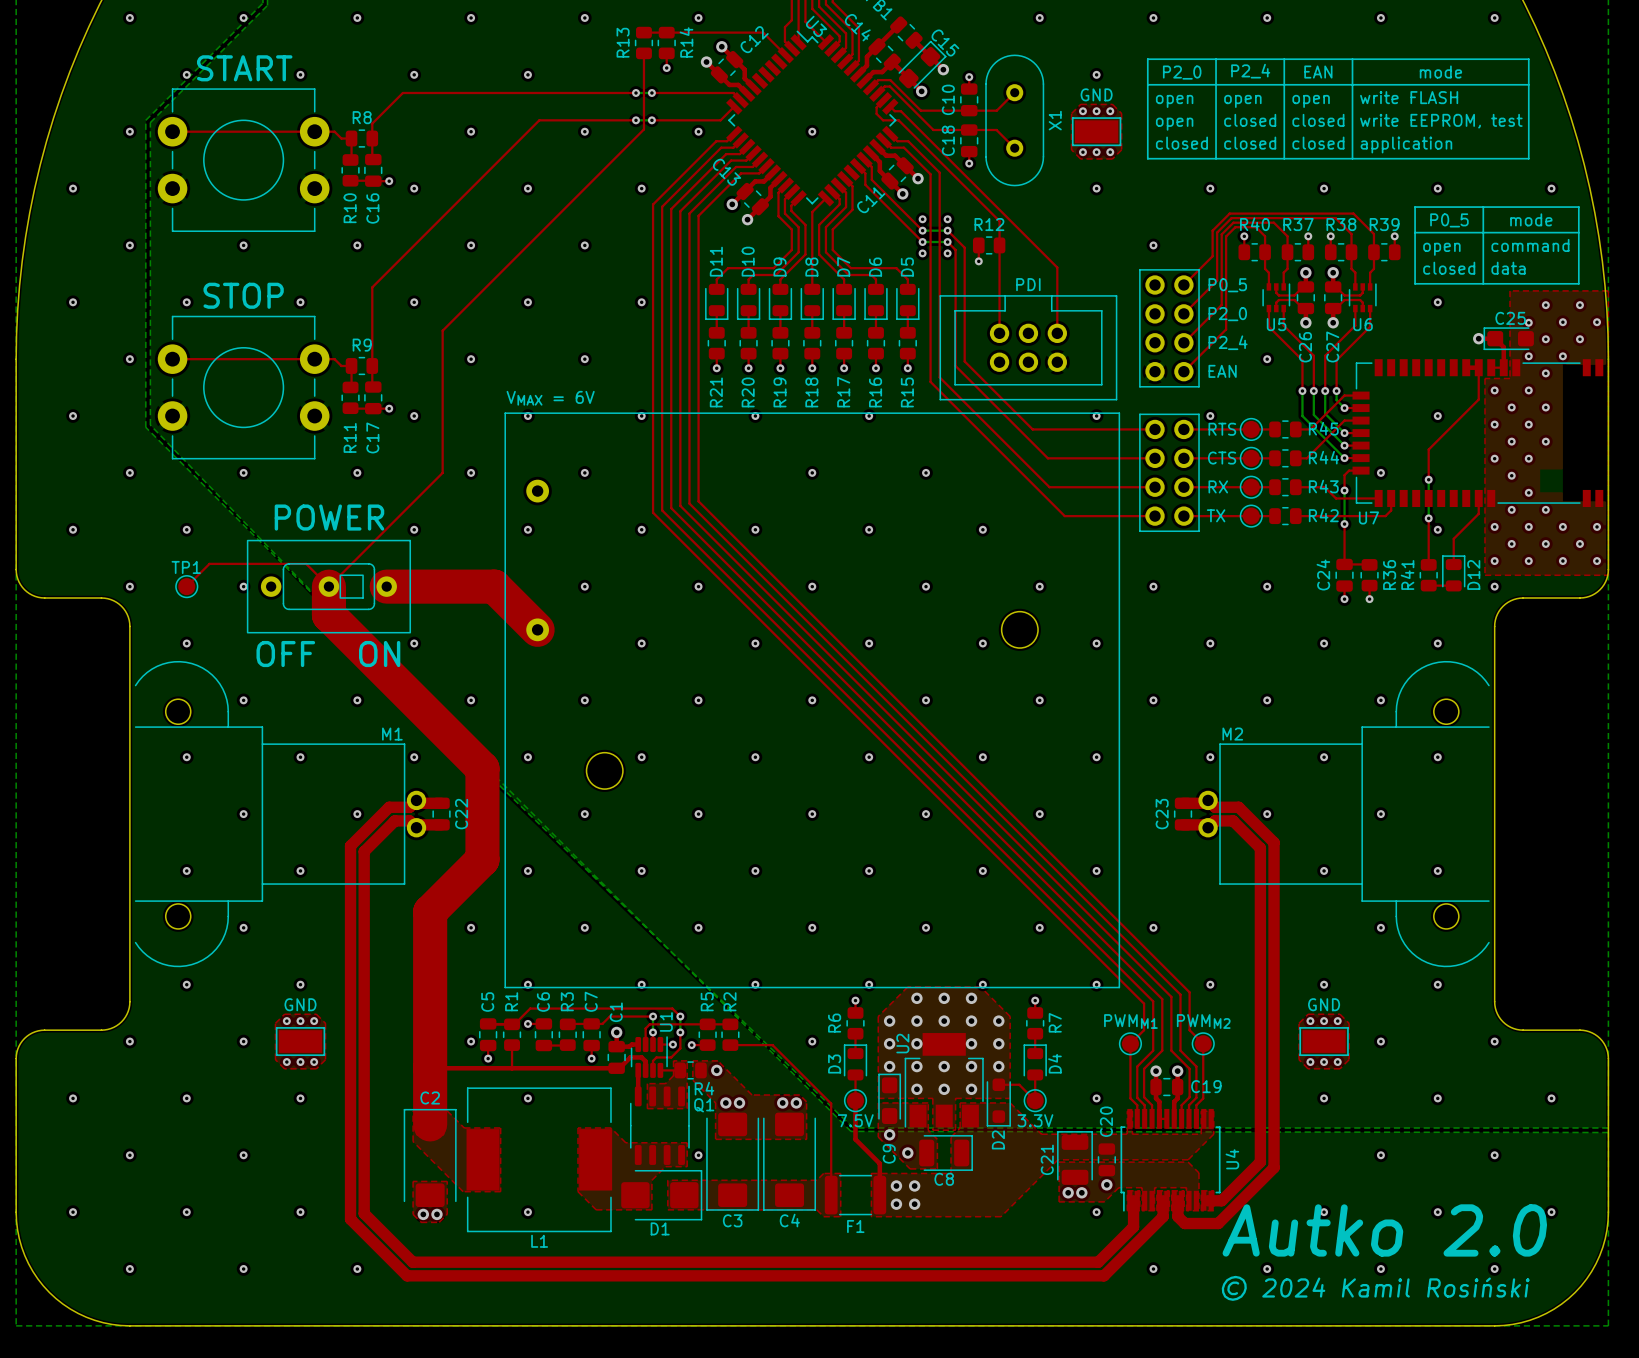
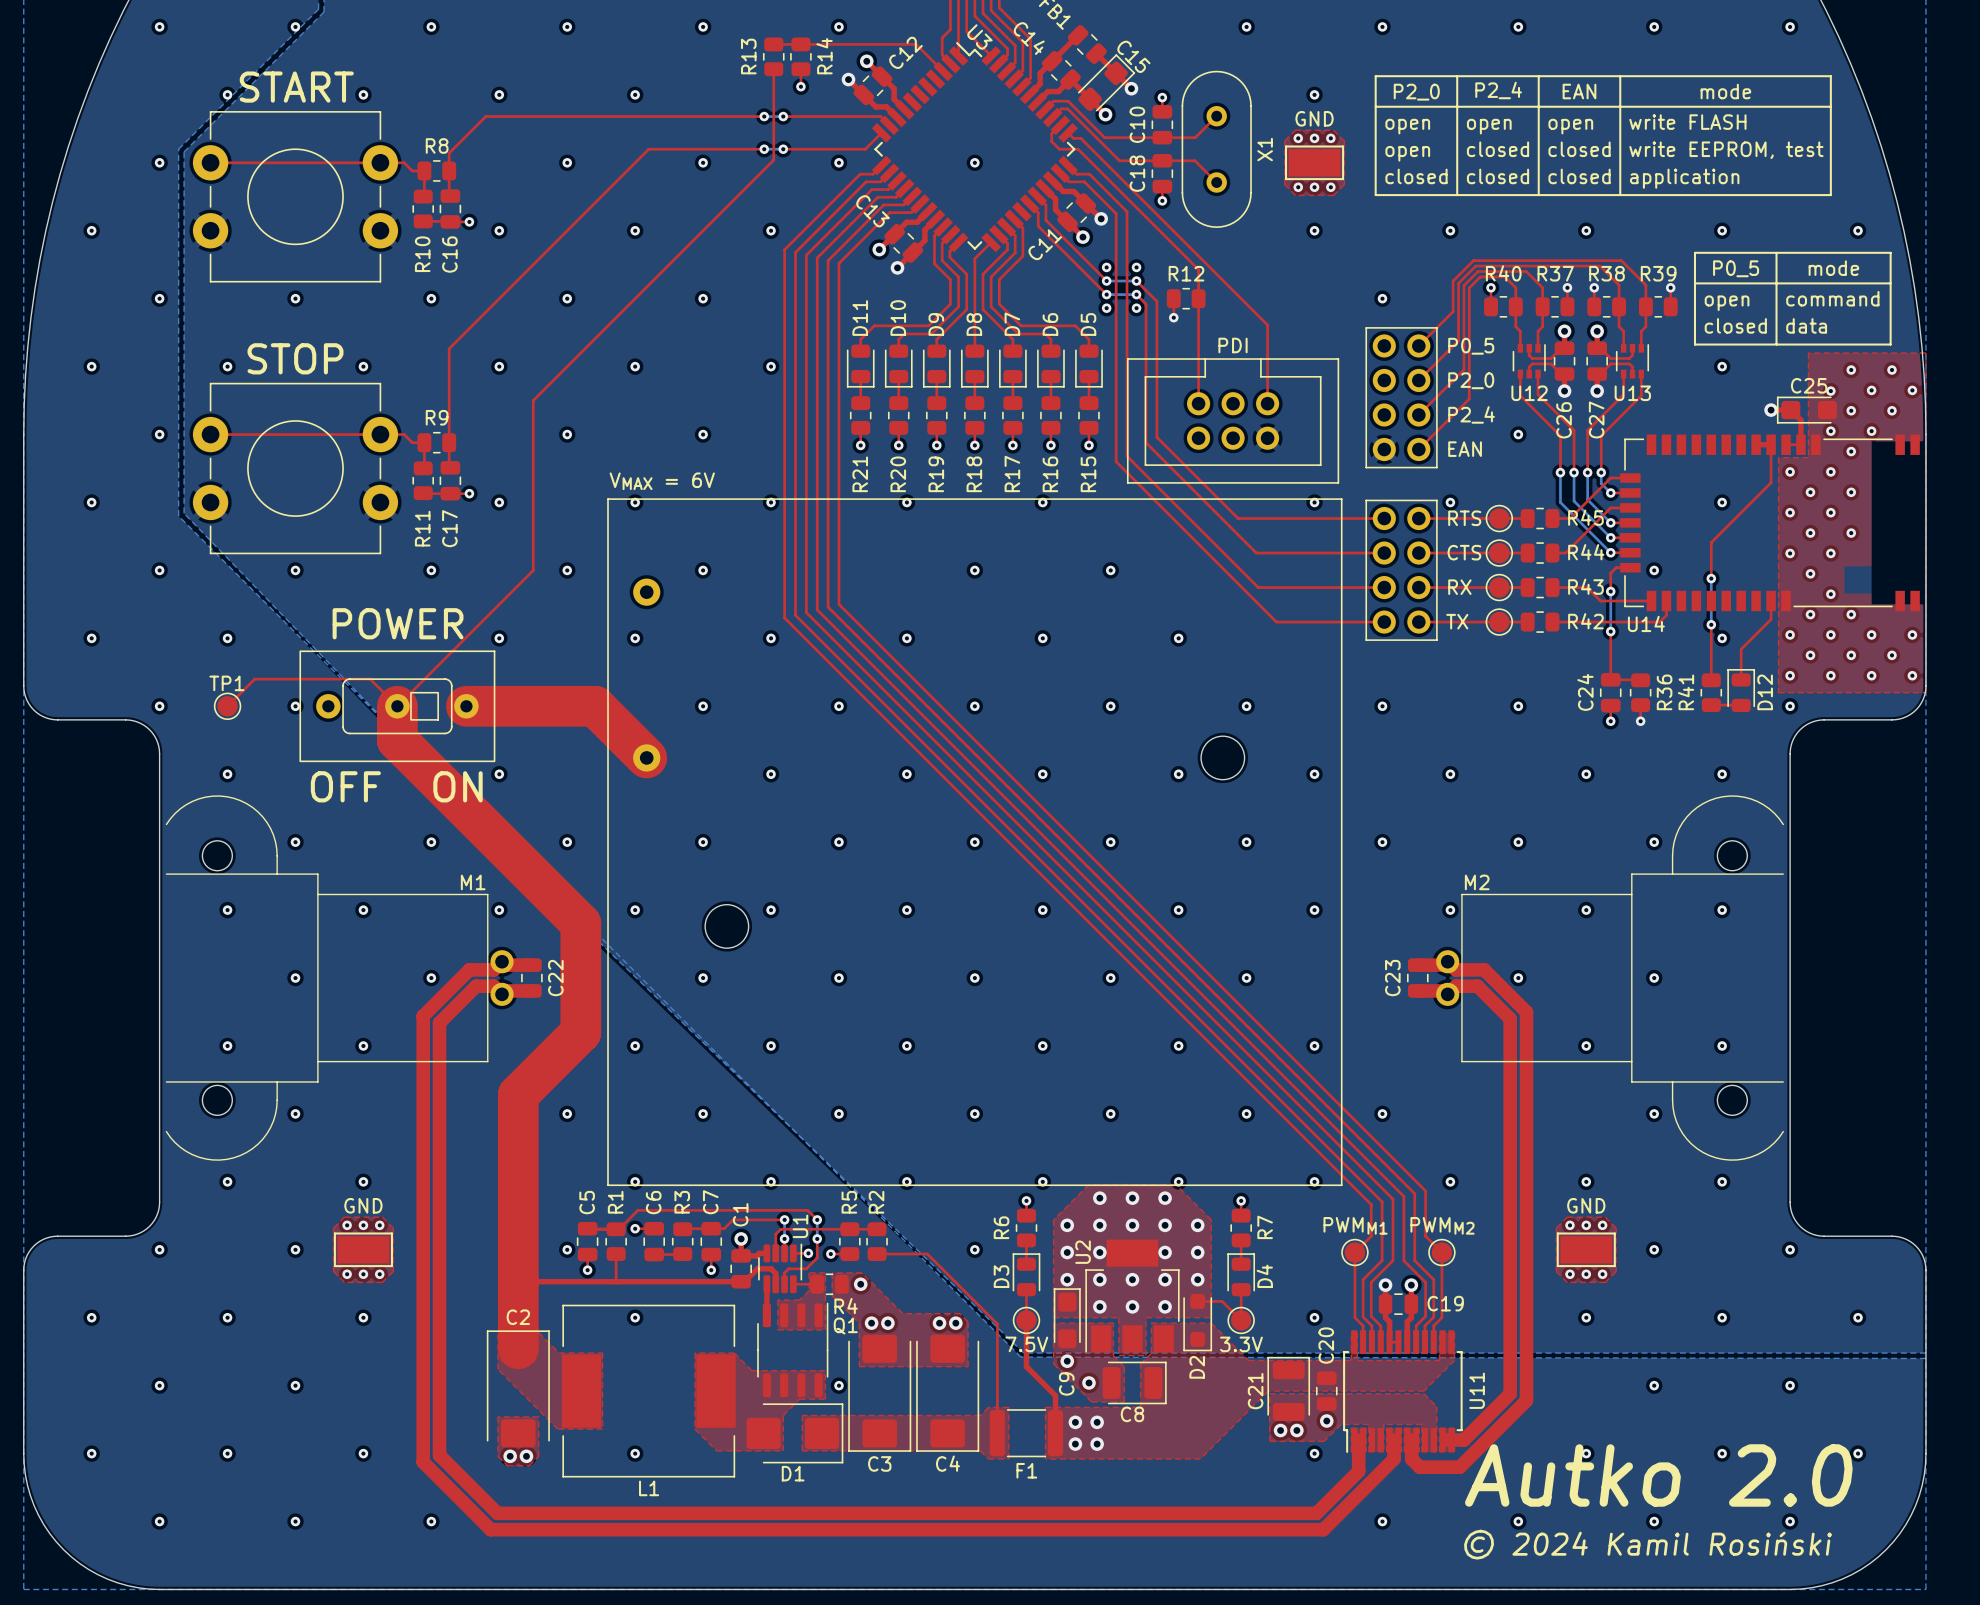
U5 name: U5 (1276, 324) -> U12 (1529, 393)
U6 name: U6 (1363, 324) -> U13 (1632, 393)
U7 name: U7 (1368, 517) -> U14 (1646, 623)
U4 name: U4 (1232, 1159) -> U11 (1477, 1390)

